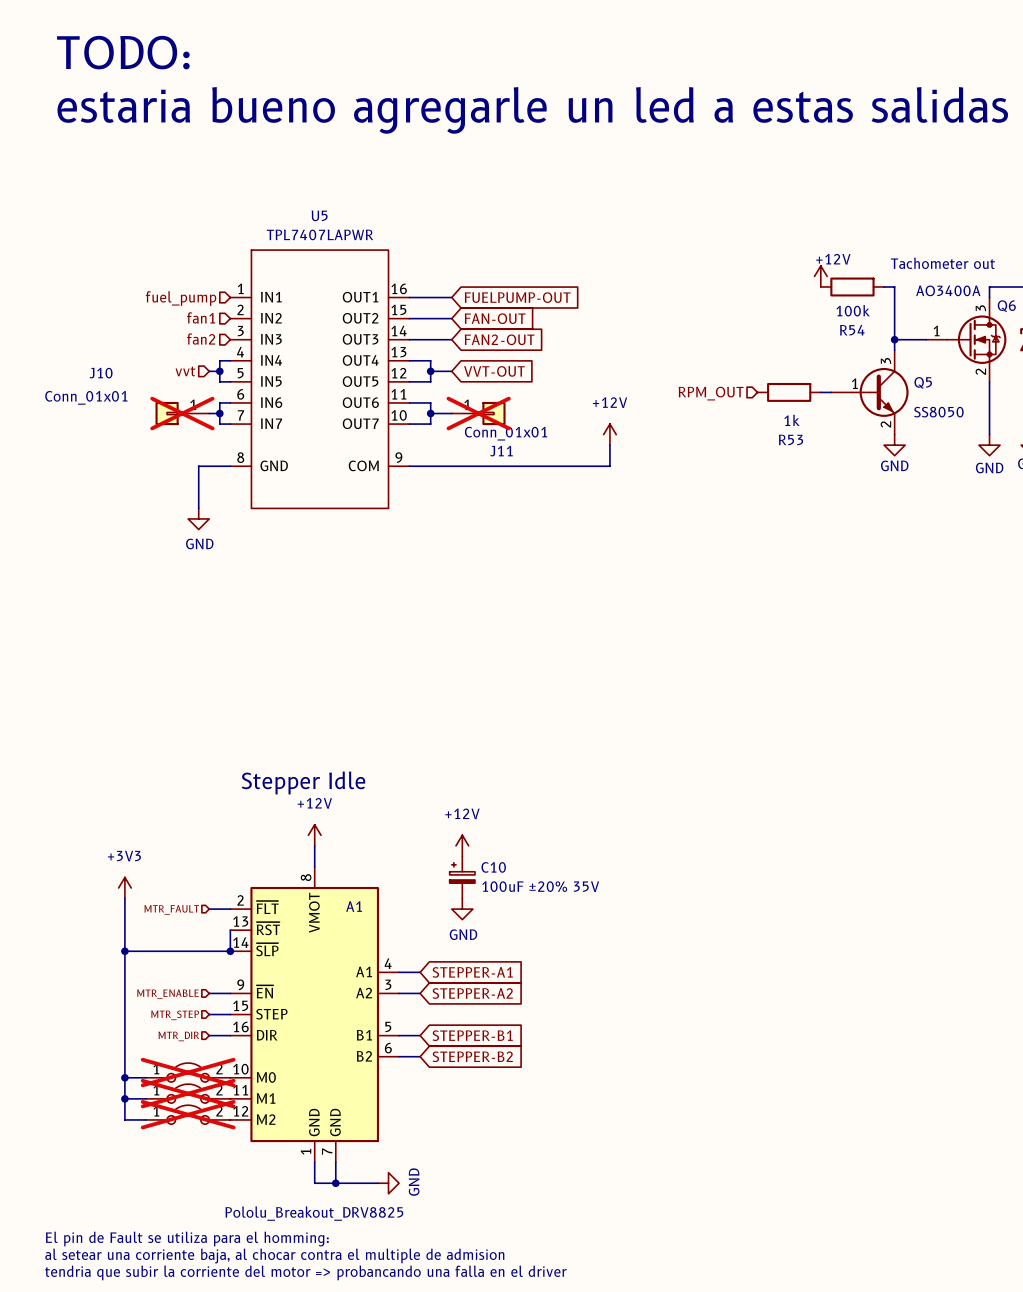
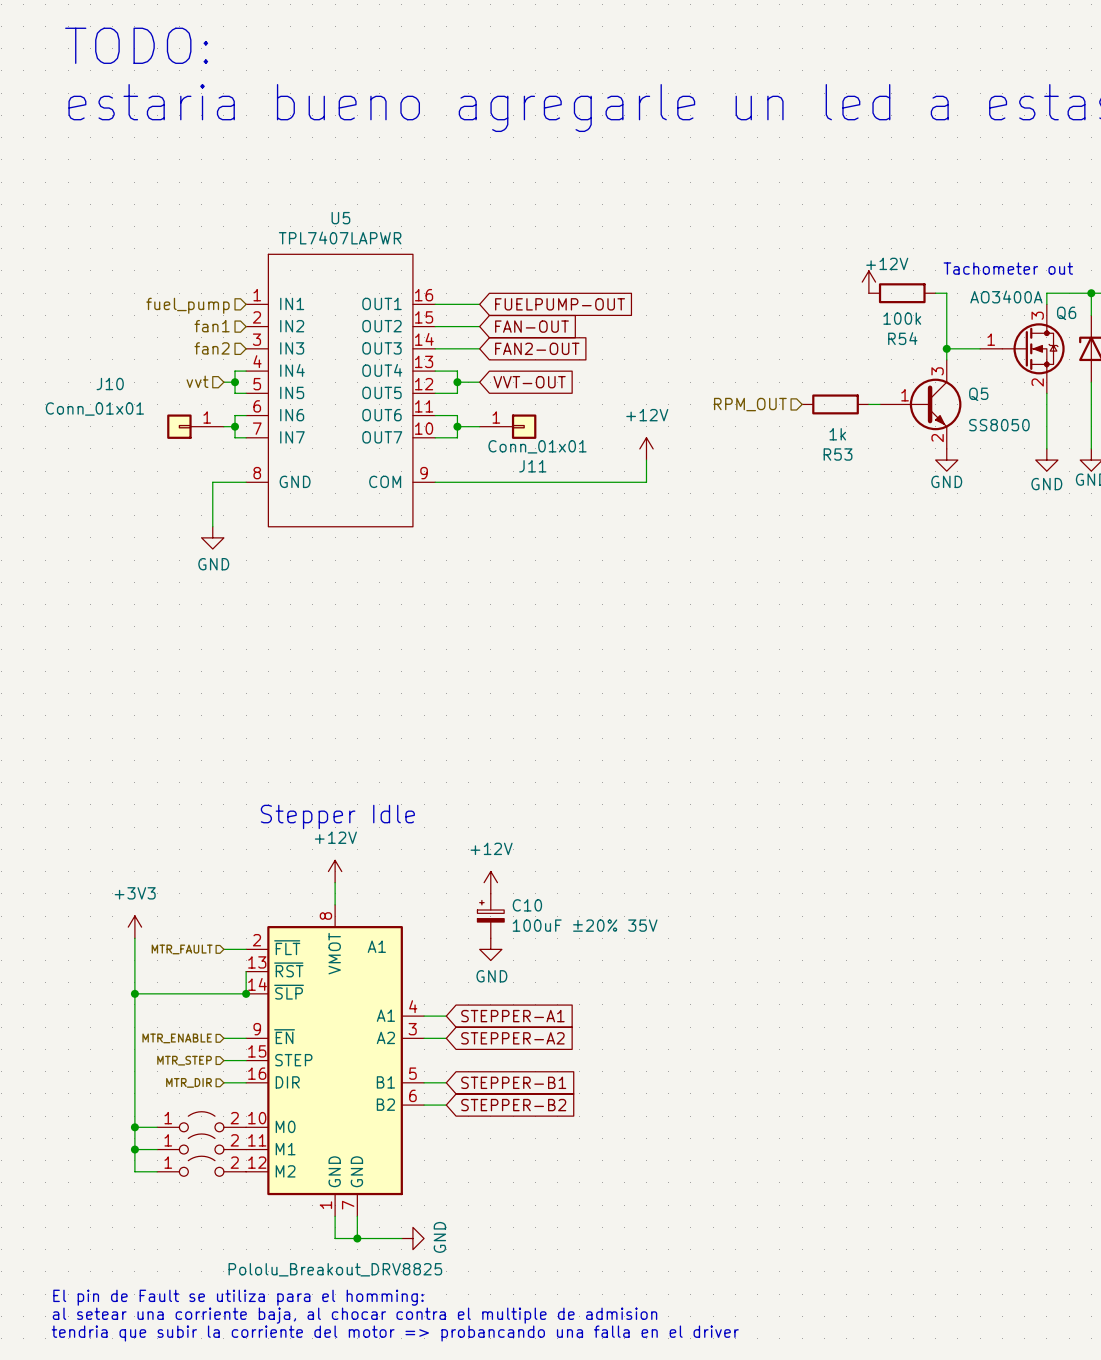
J10 do-not-place cross: (182, 413) -> none
J11 do-not-place cross: (478, 413) -> none
part do-not-place cross: (188, 1072) -> none
part do-not-place cross: (188, 1093) -> none
part do-not-place cross: (188, 1114) -> none

